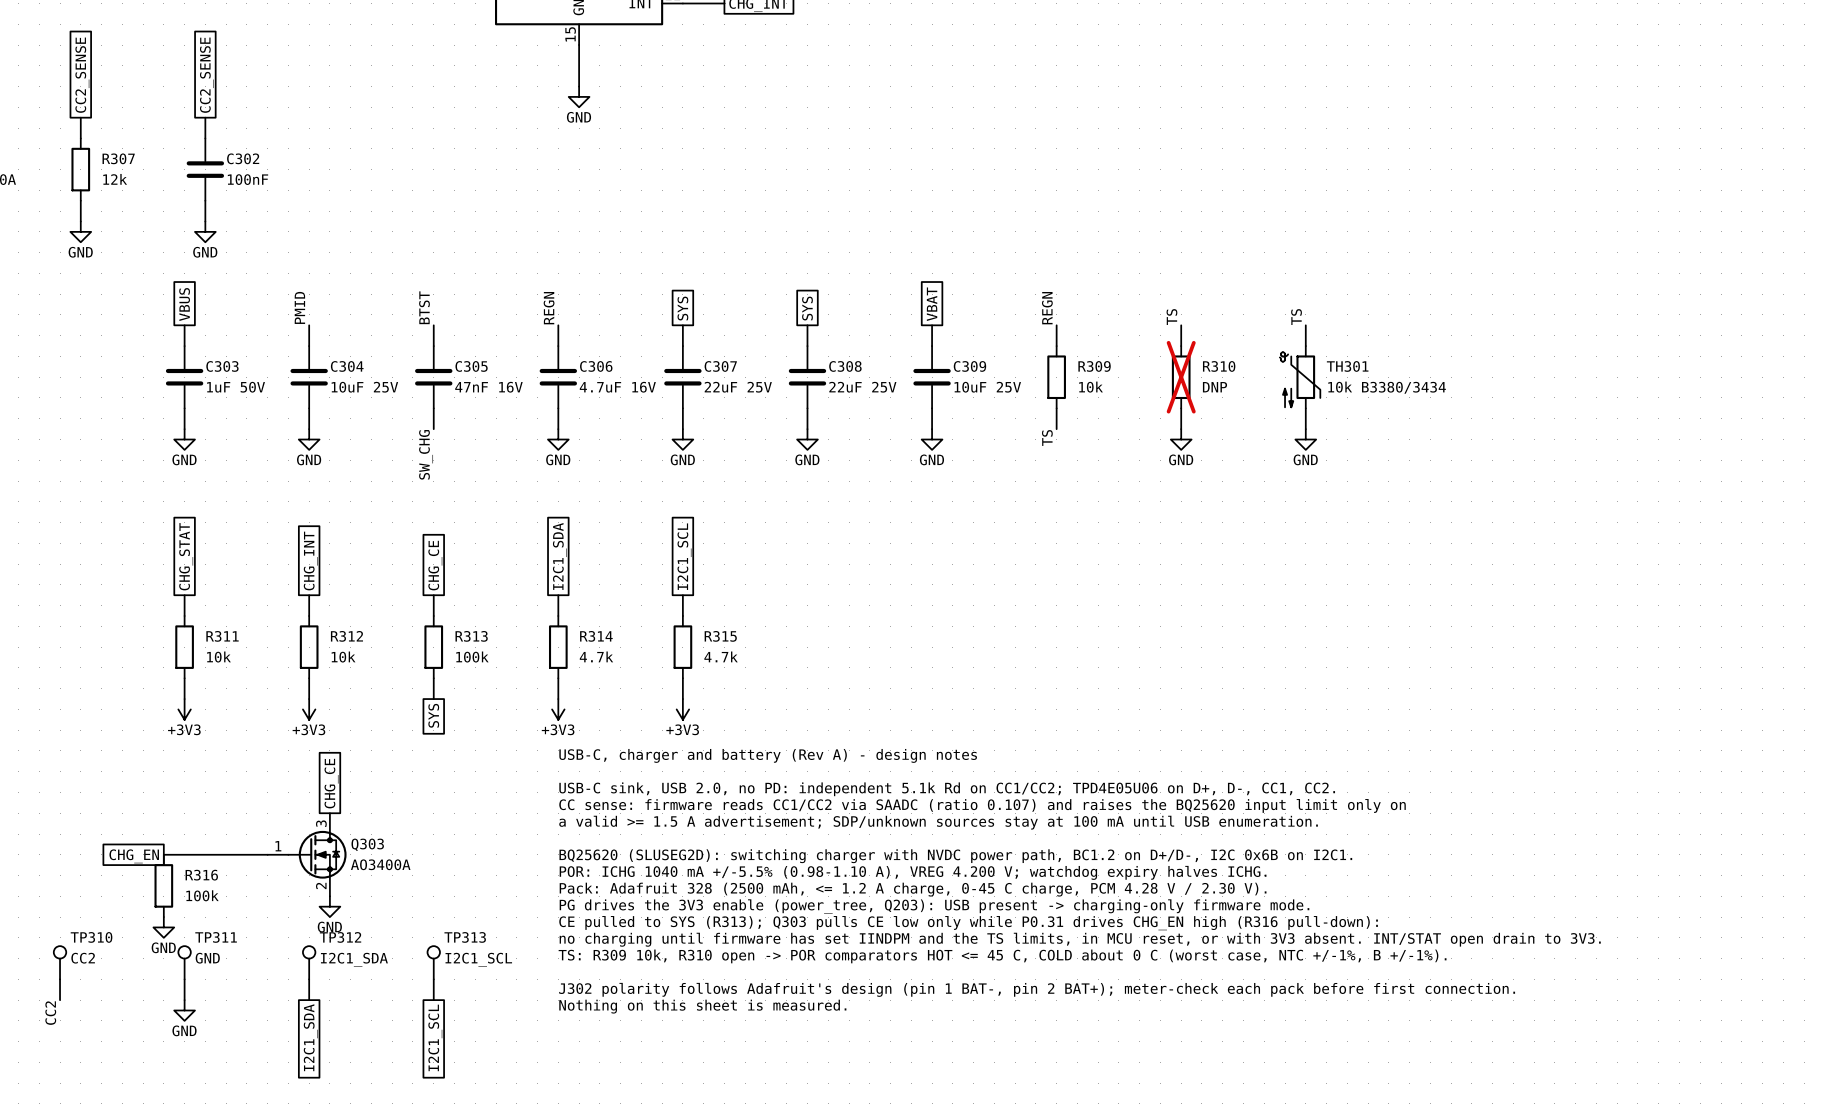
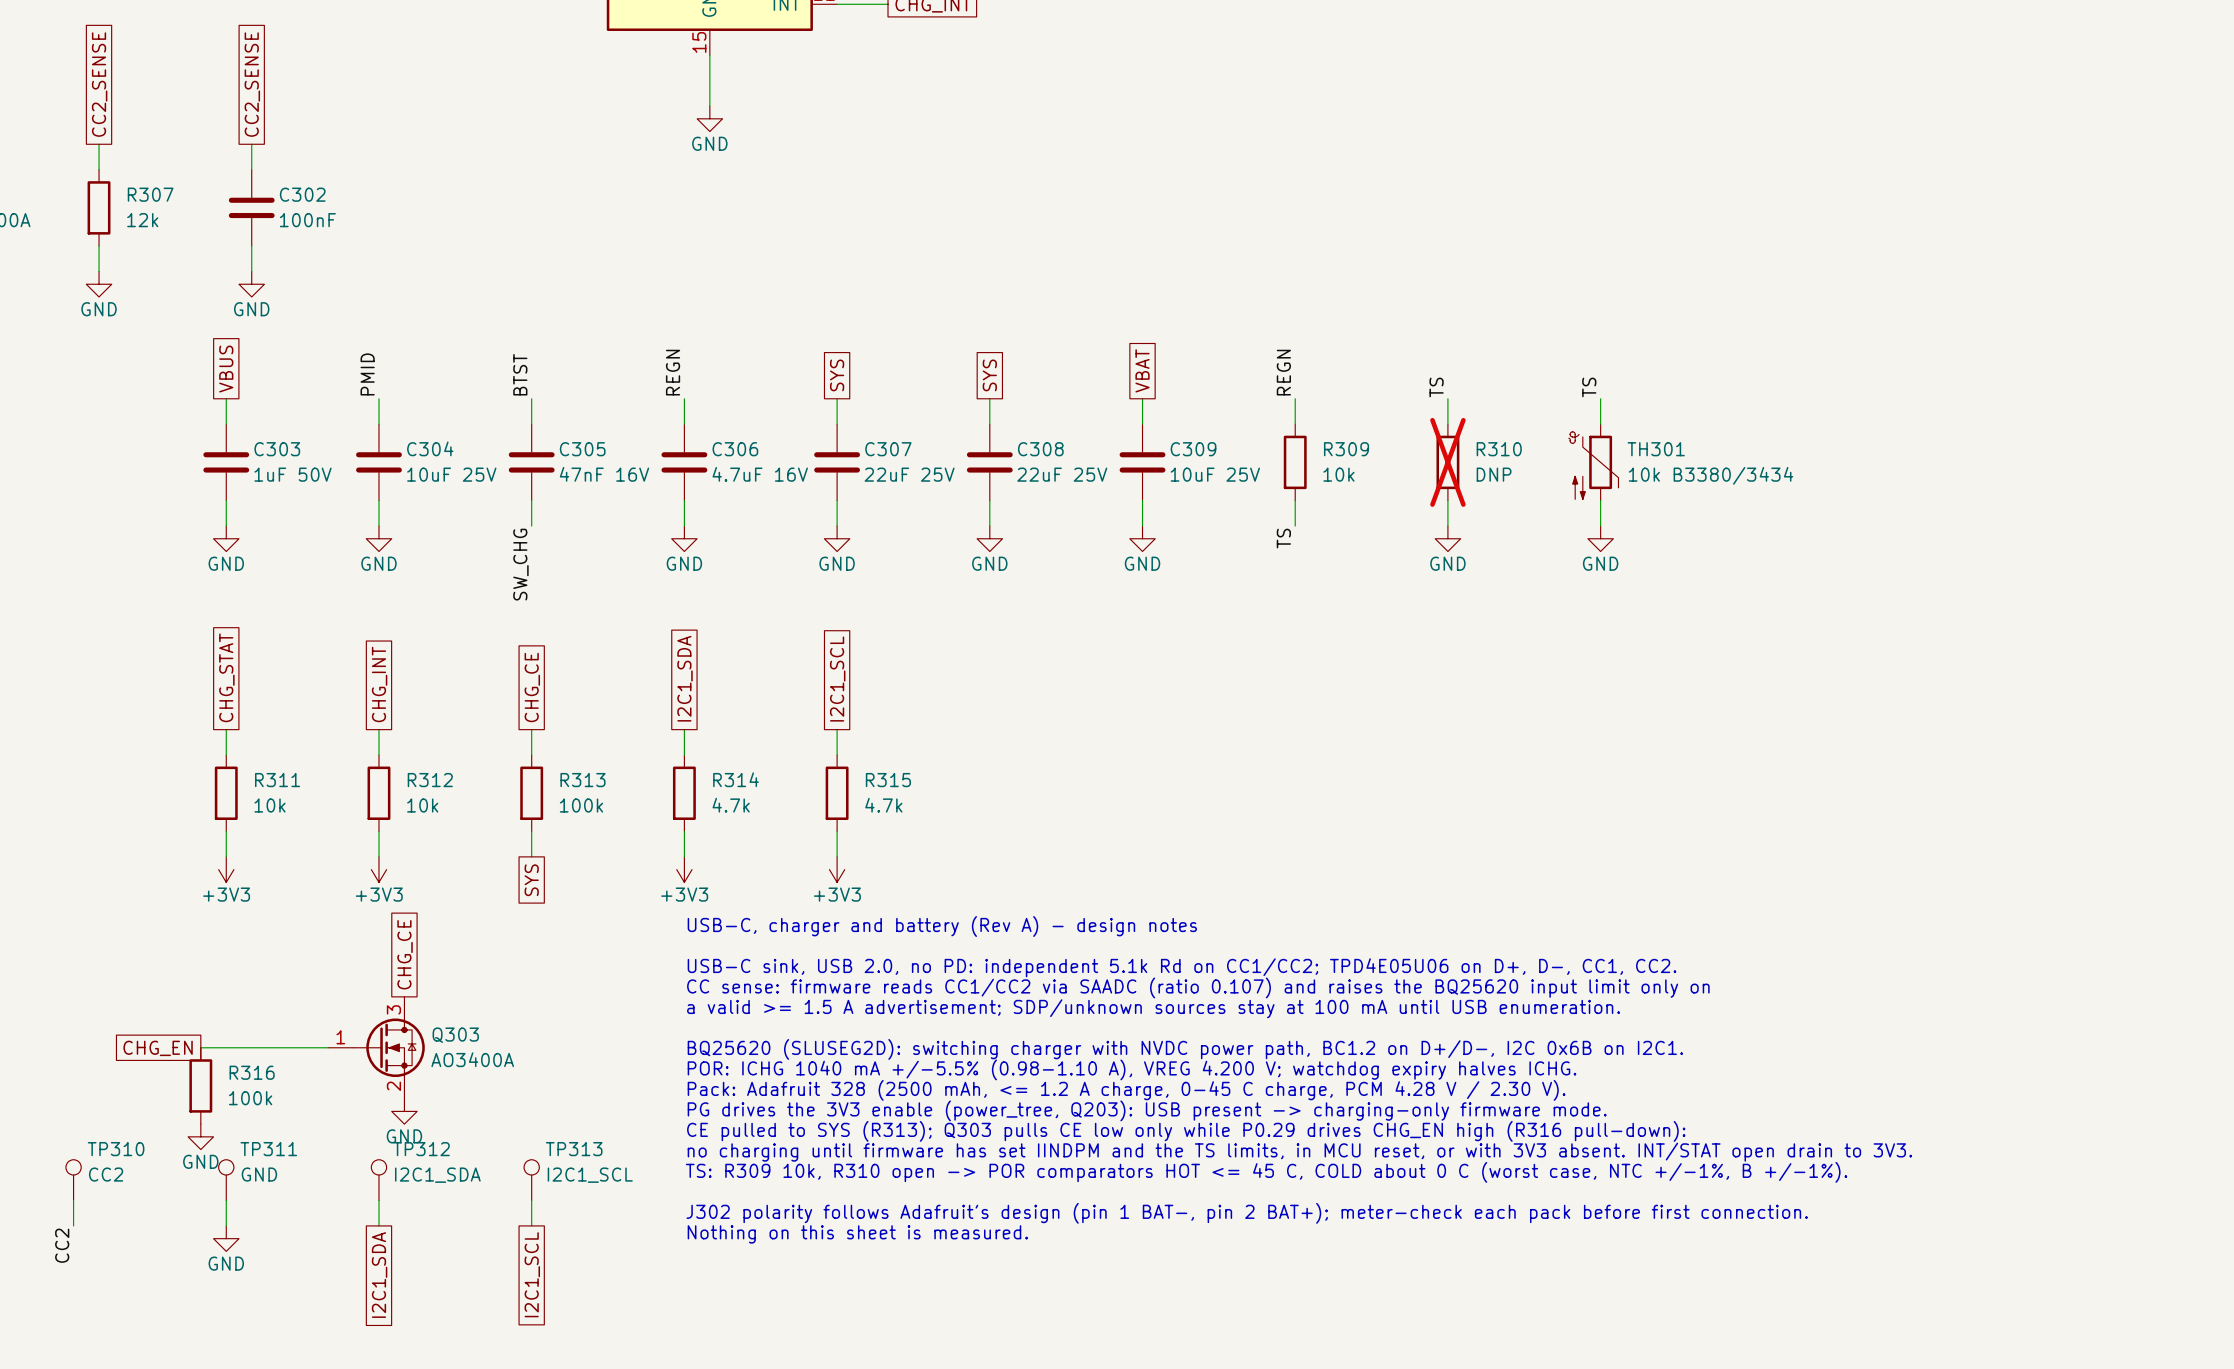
text: CE pulled to SYS (R313); Q303 pulls CE low only while P0.31 drives CHG_EN high (R316 pull-down): (968, 923) -> CE pulled to SYS (R313); Q303 pulls CE low only while P0.29 drives CHG_EN high (R316 pull-down): (1186, 1131)

